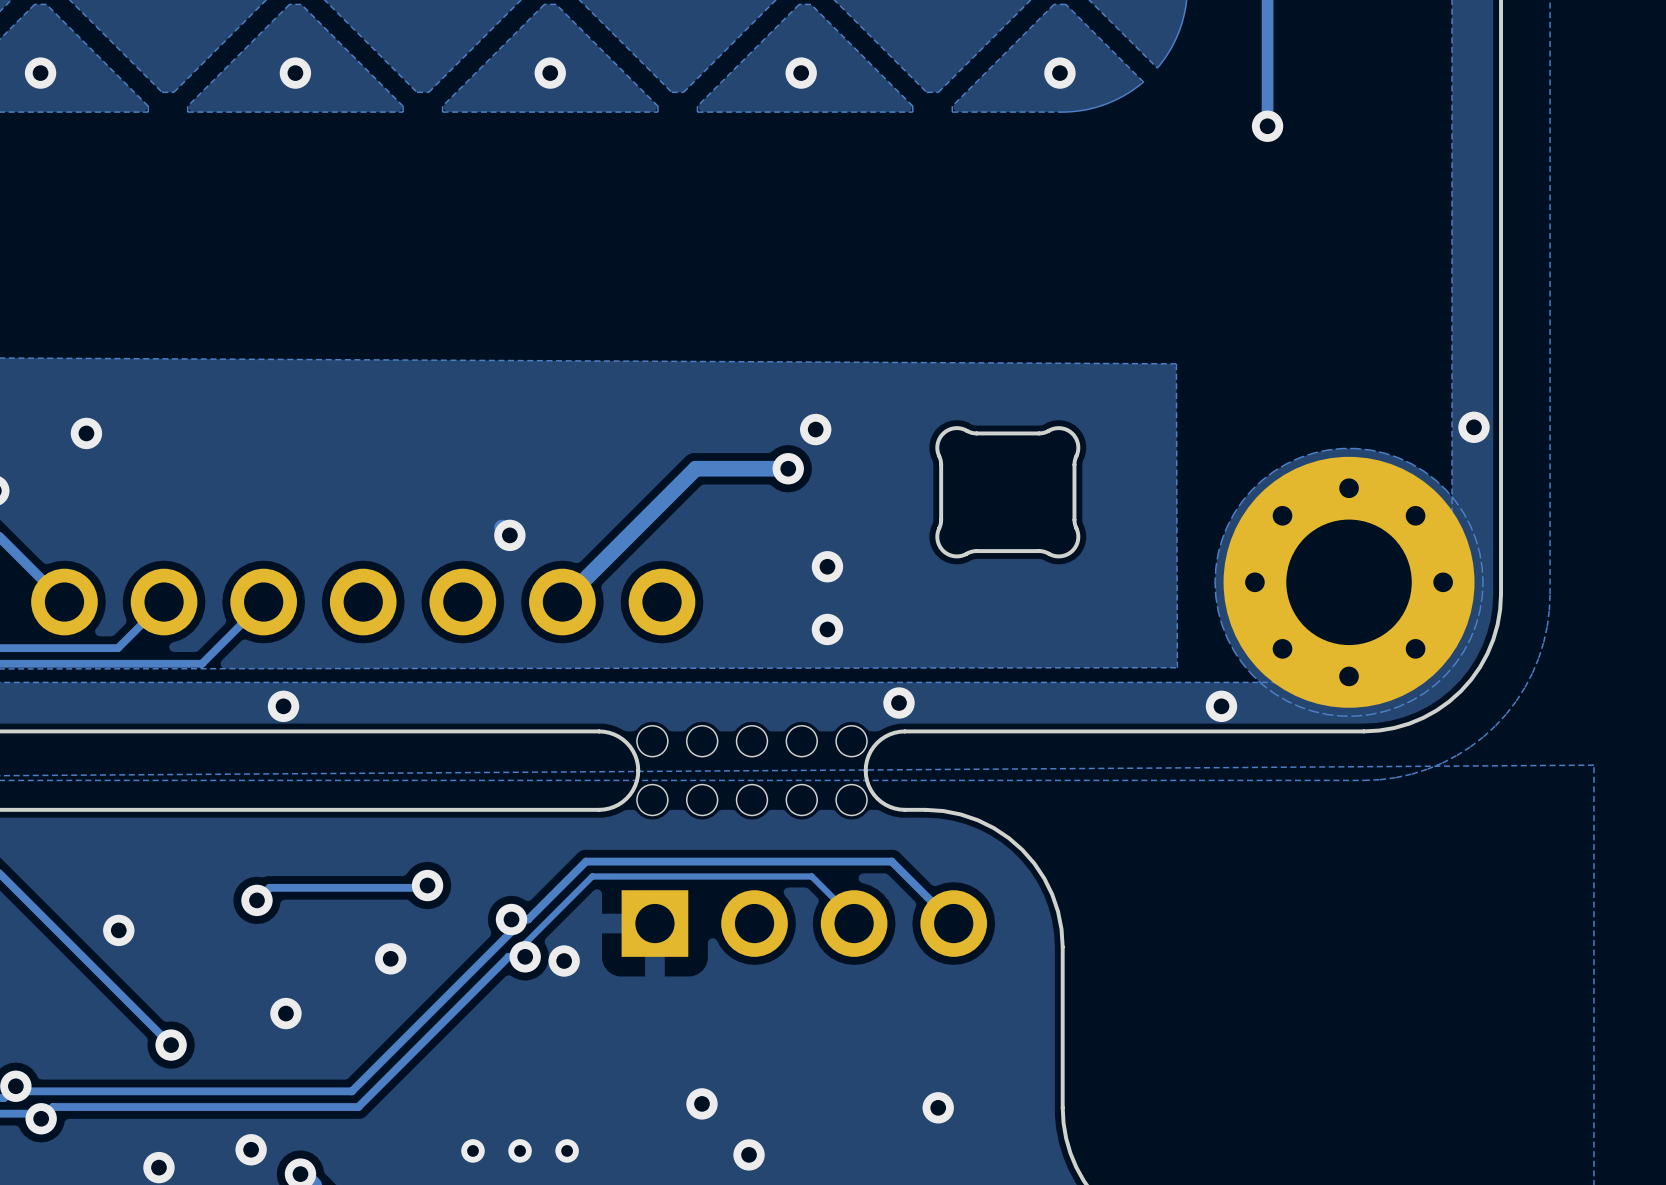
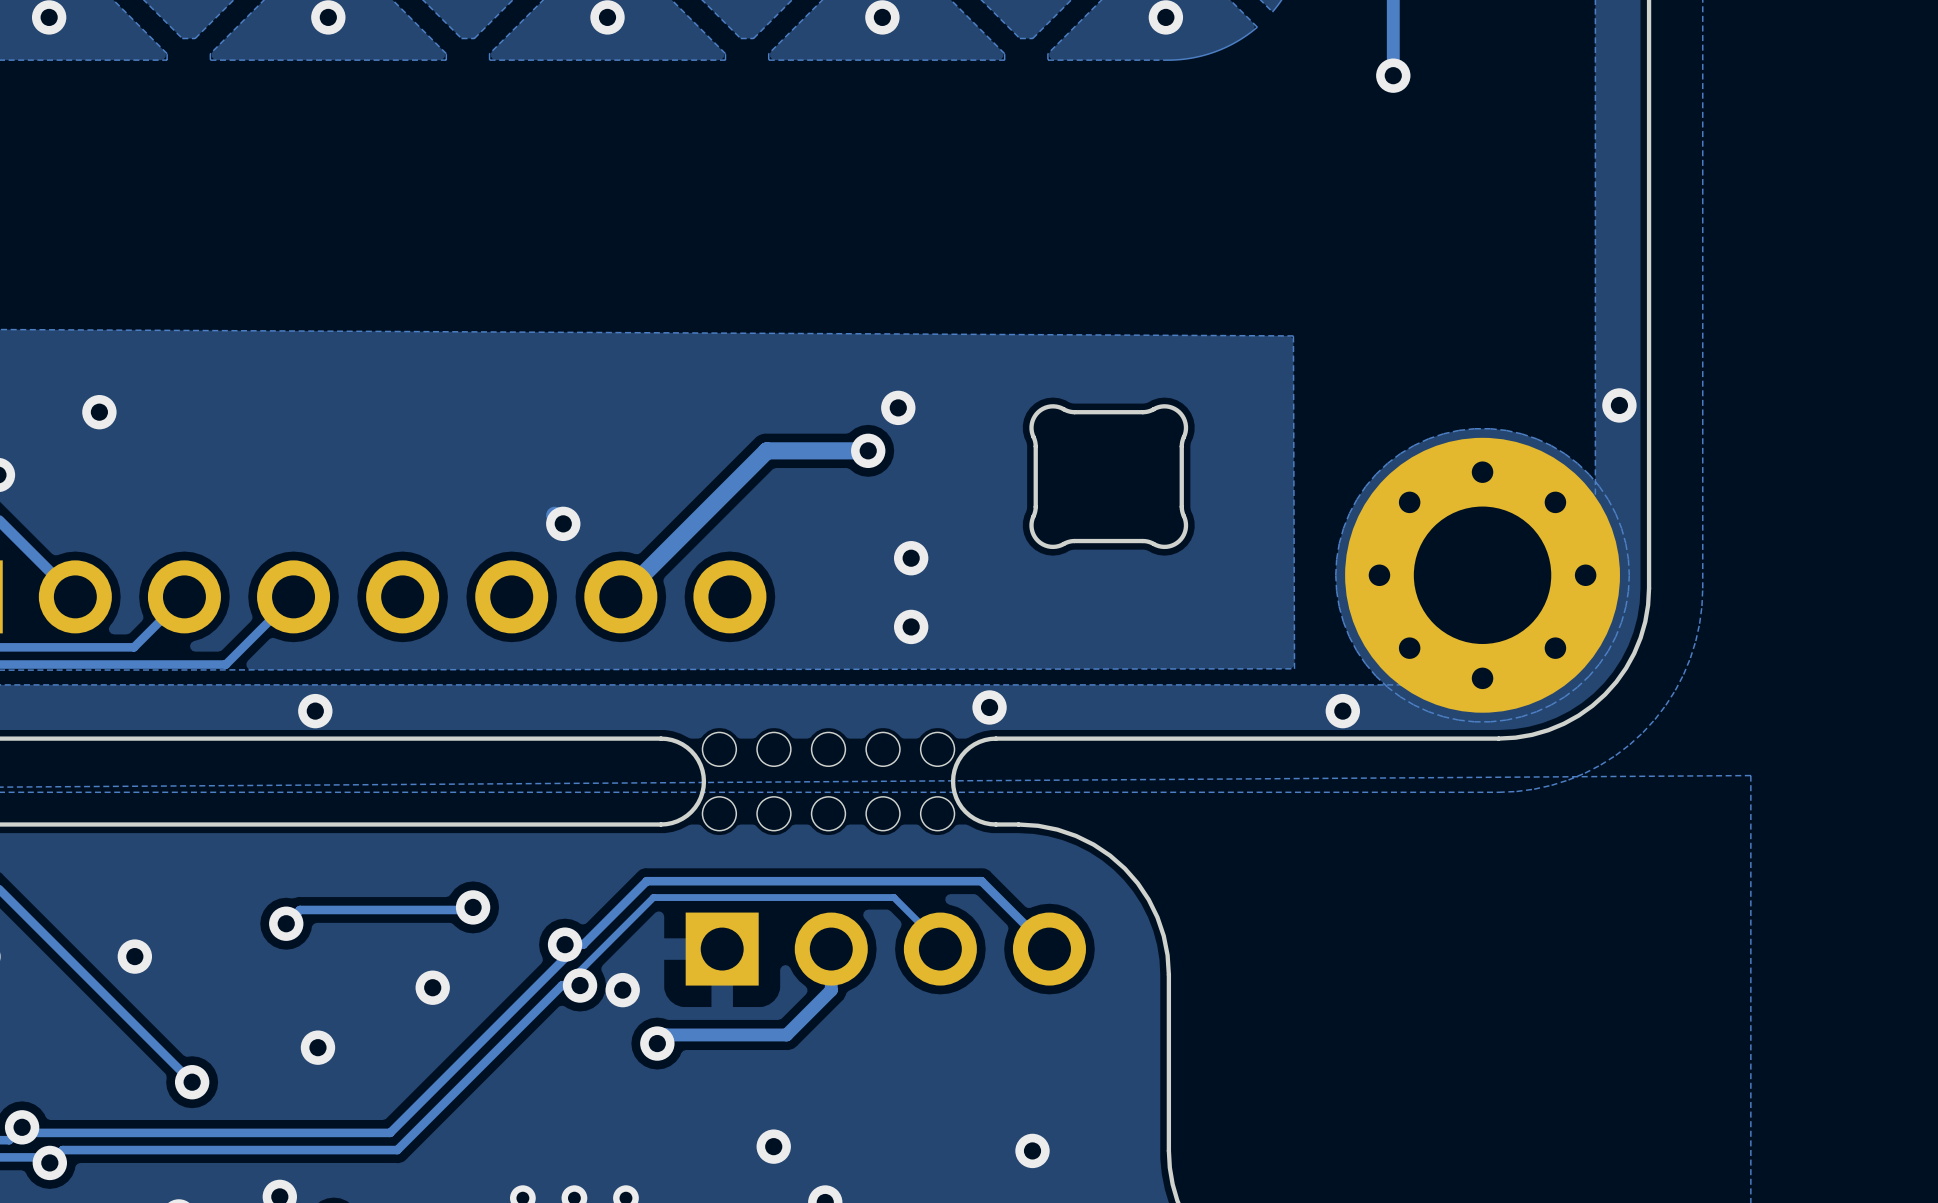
track: none -> (831, 970) (831, 990) (786, 1034) (665, 1034) (657, 1043)
via: none -> (657, 1043)

